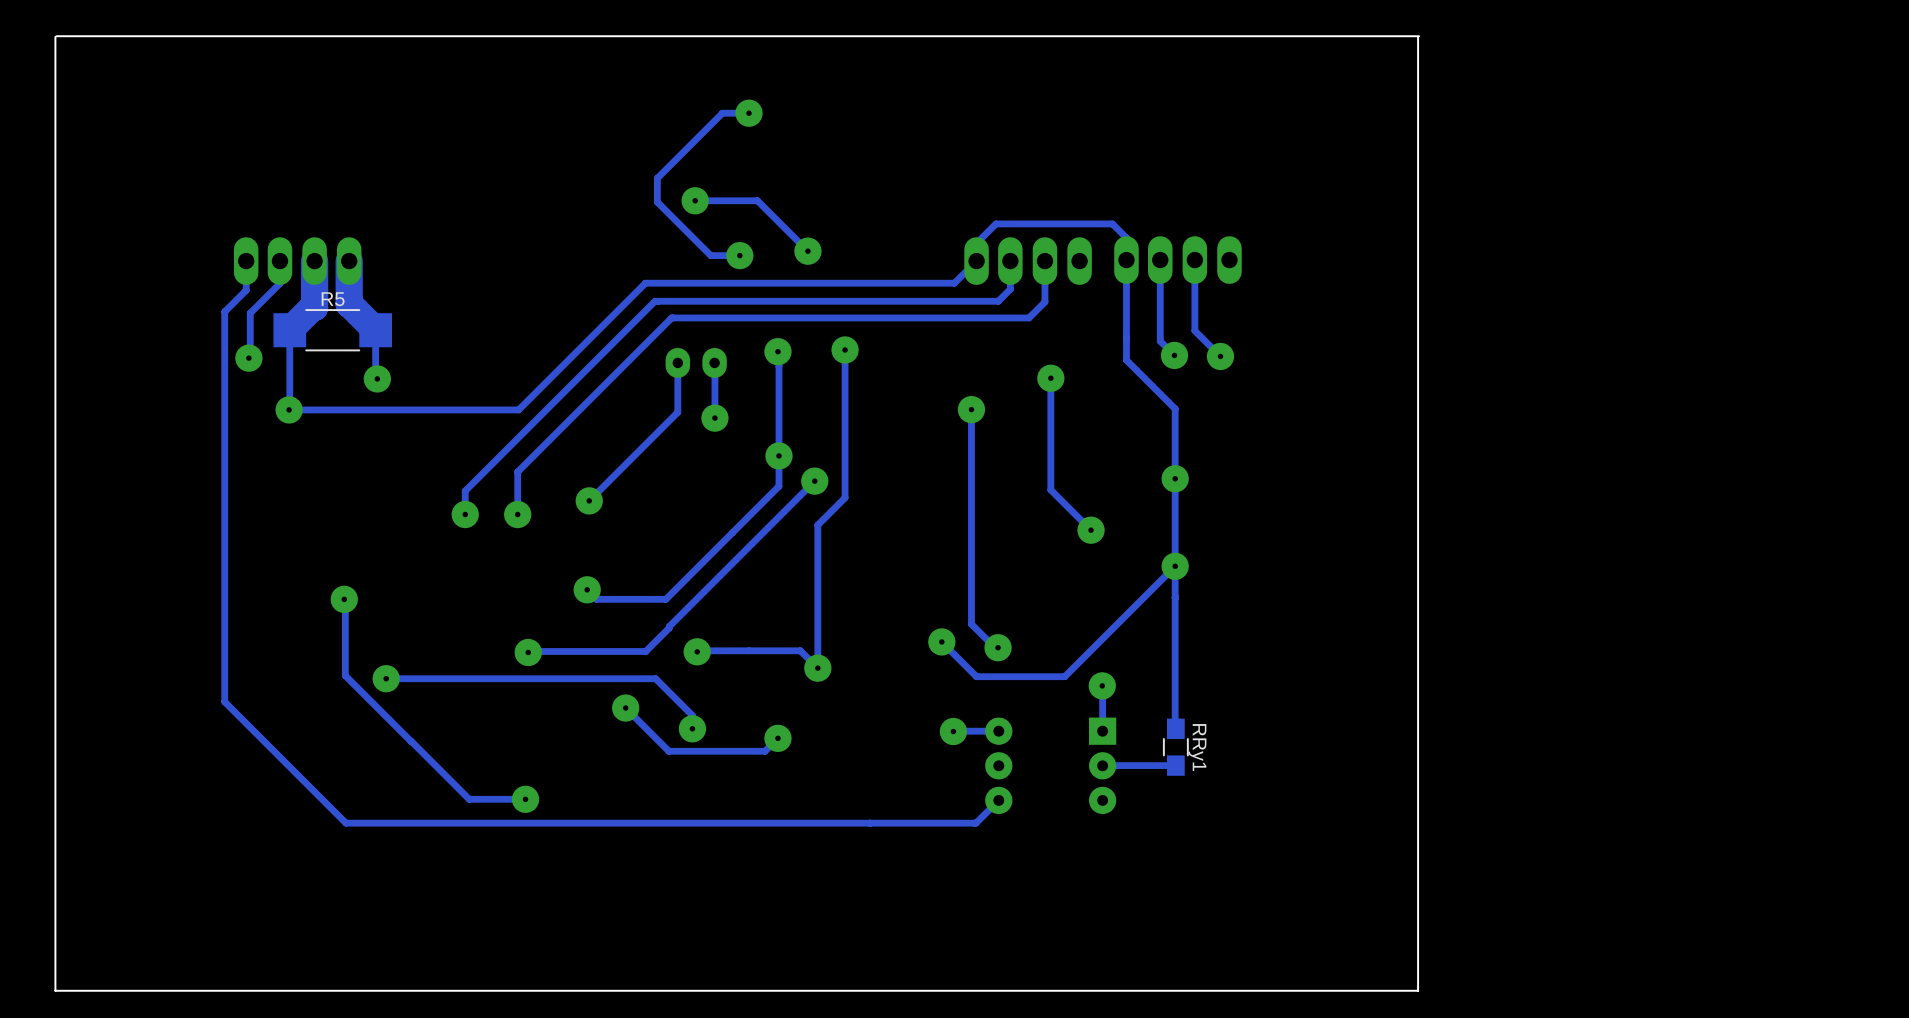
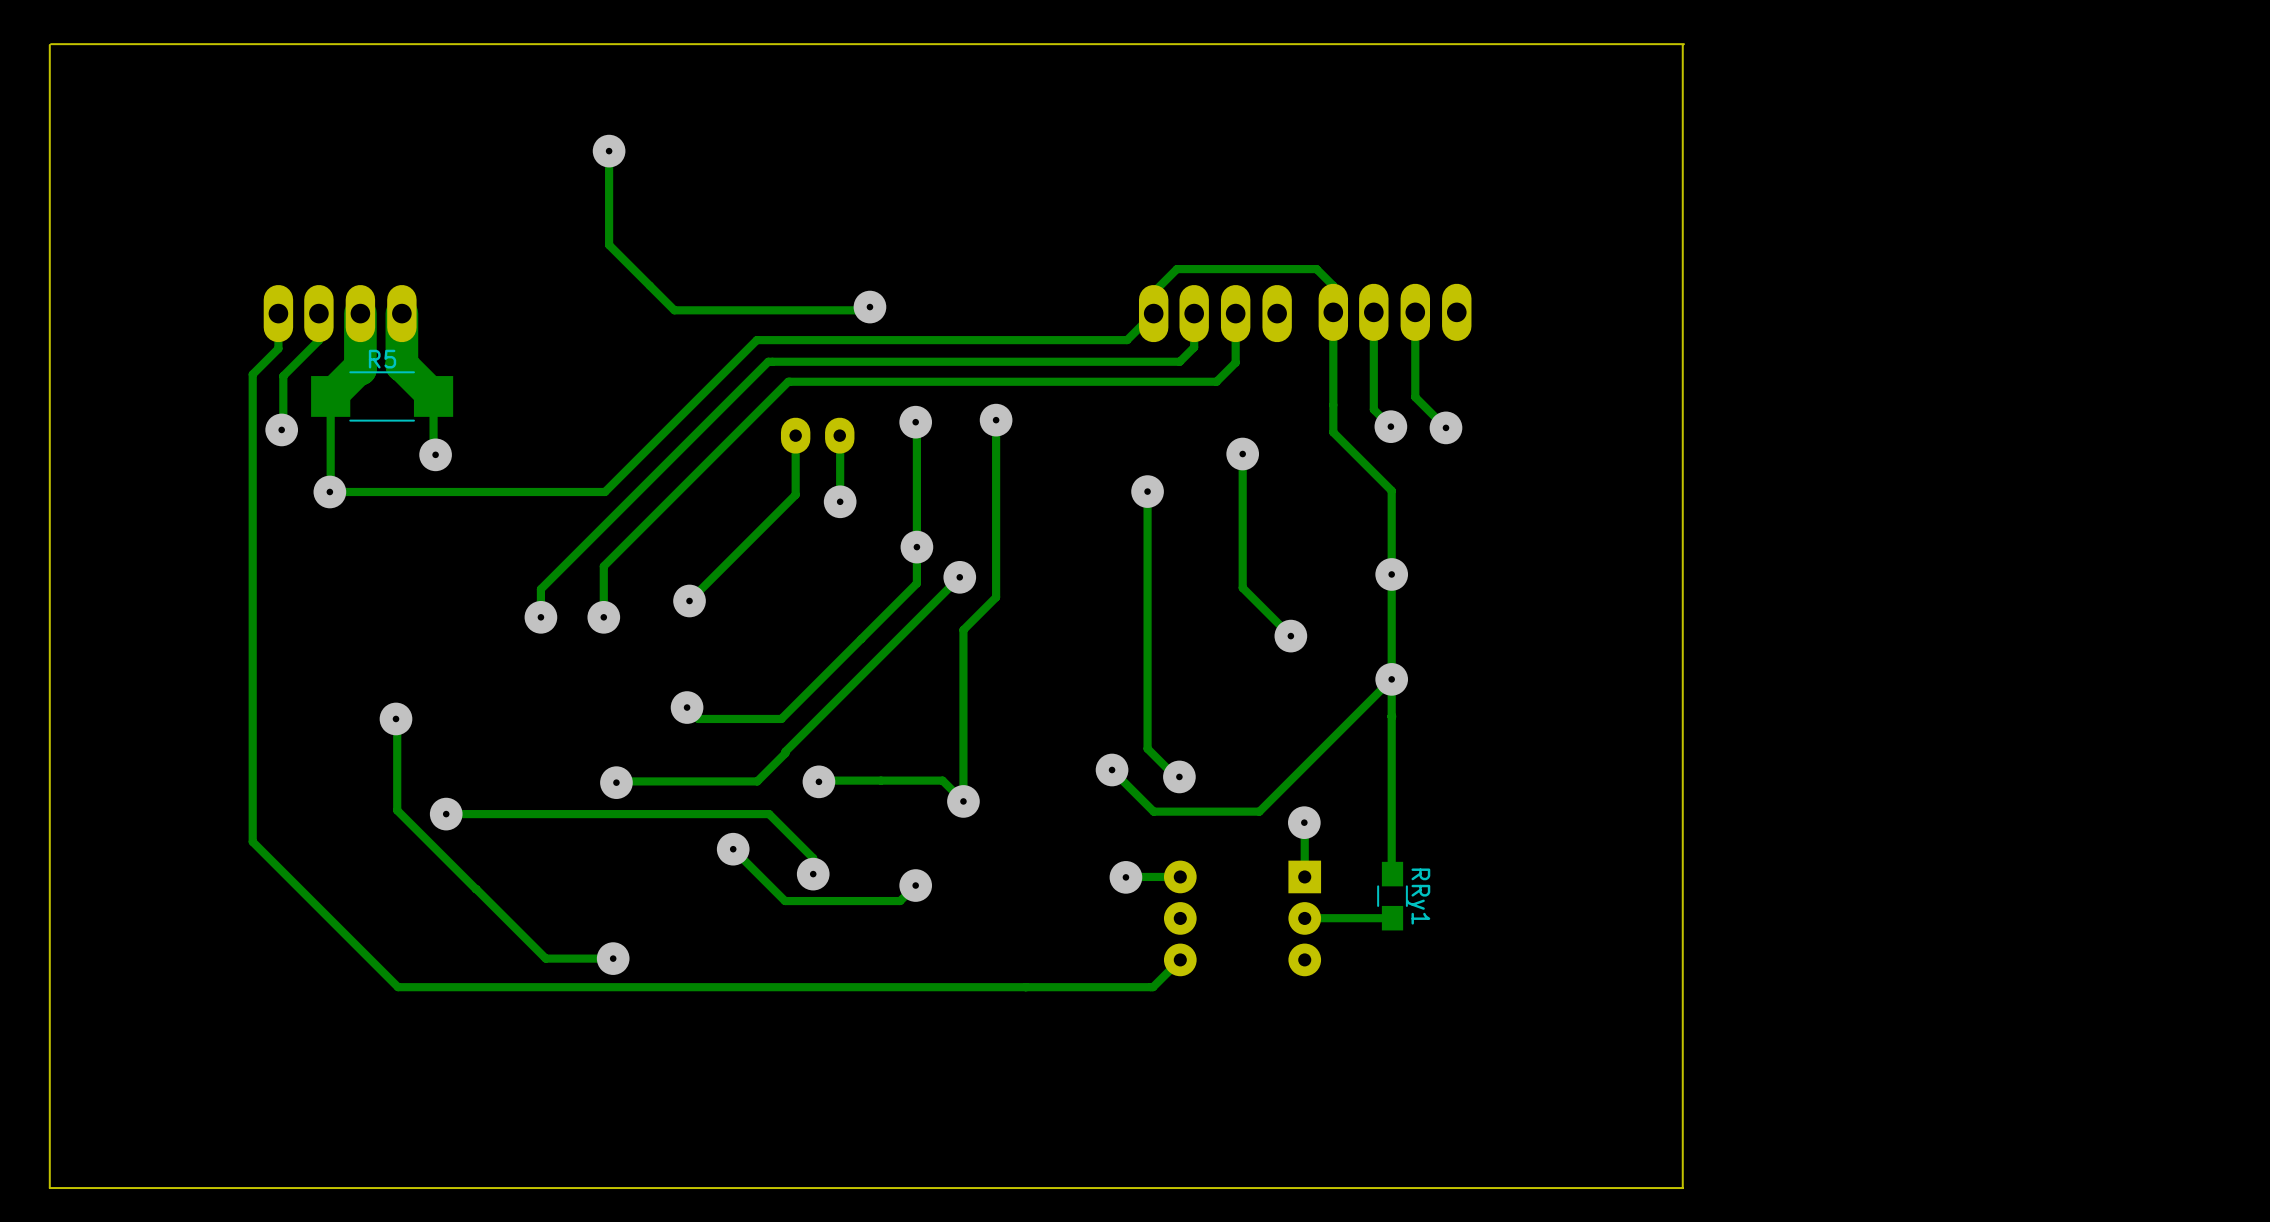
track: (749, 113) (722, 113) (657, 178) (657, 202) (710, 255) (739, 255) -> none
via: (749, 113) -> none
track: none -> (609, 151) (609, 245) (674, 310) (866, 310)
via: none -> (609, 151)
track: (695, 200) (757, 200) (807, 251) -> none
via: (695, 200) -> none
via: (807, 251) -> none

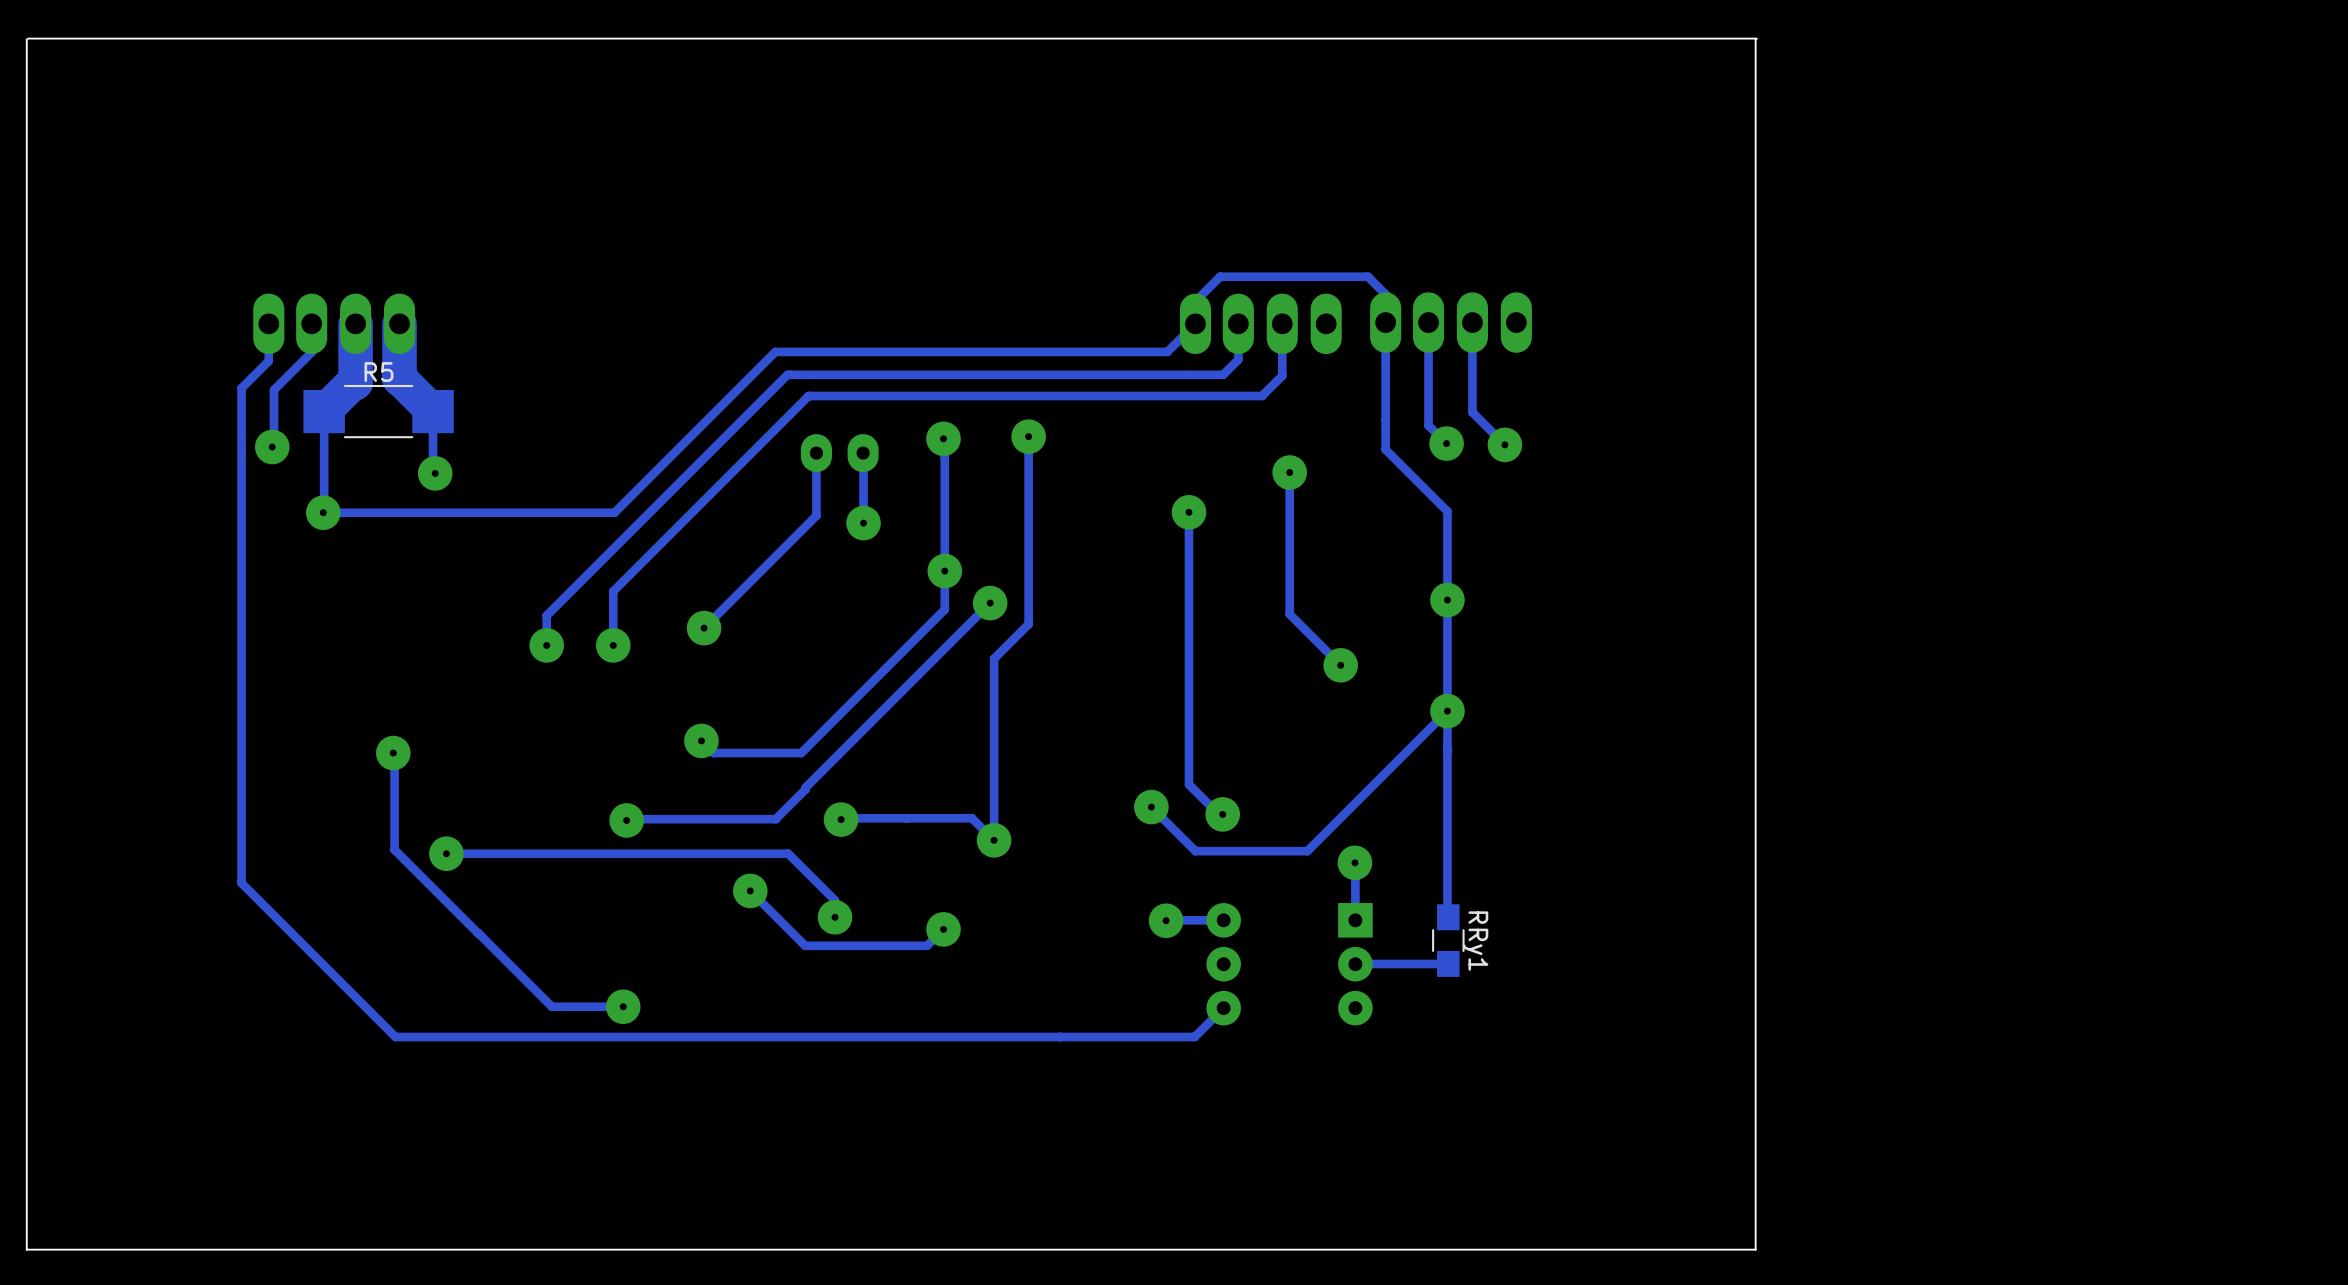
track: (609, 151) (609, 245) (674, 310) (866, 310) -> none
via: (609, 151) -> none
via: (869, 307) -> none

